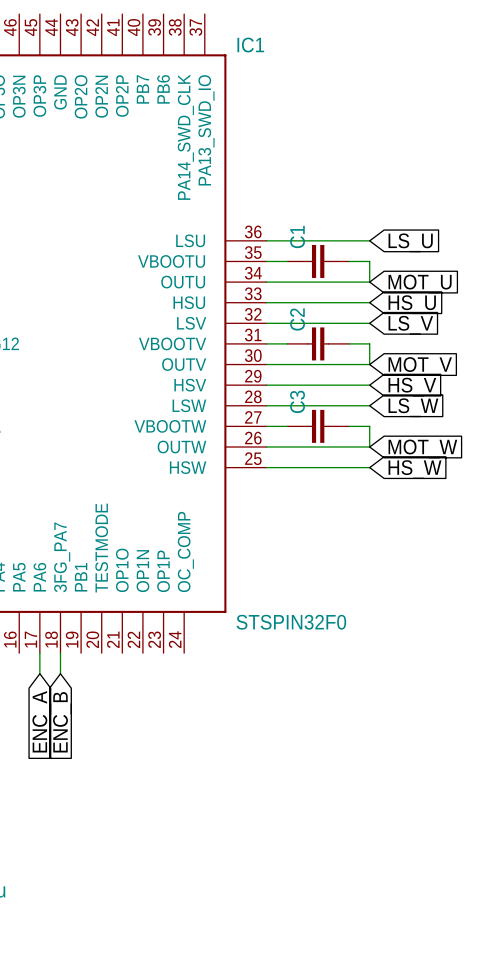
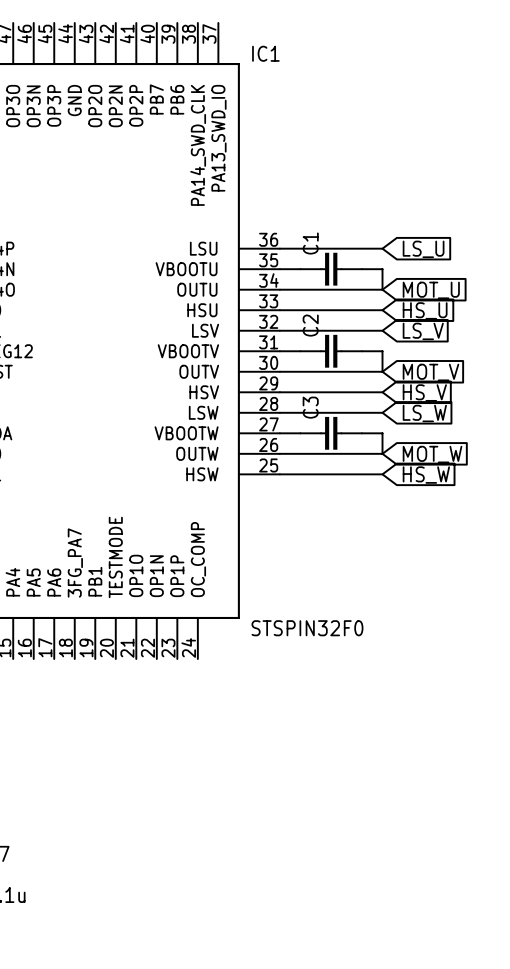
wire: (39, 653) (39, 673) -> none
wire: (60, 653) (60, 673) -> none
global label: ENC_A (41, 721) -> none
global label: ENC_B (62, 722) -> none

